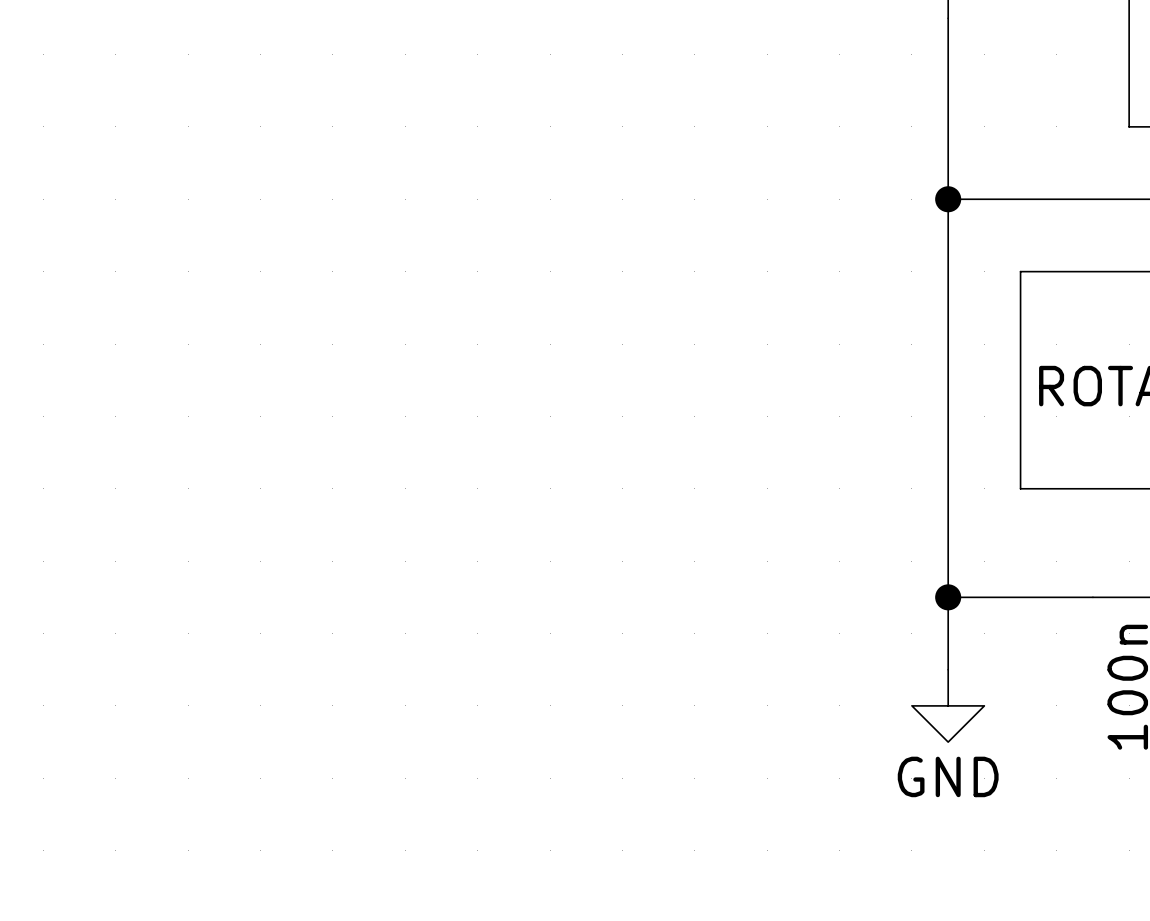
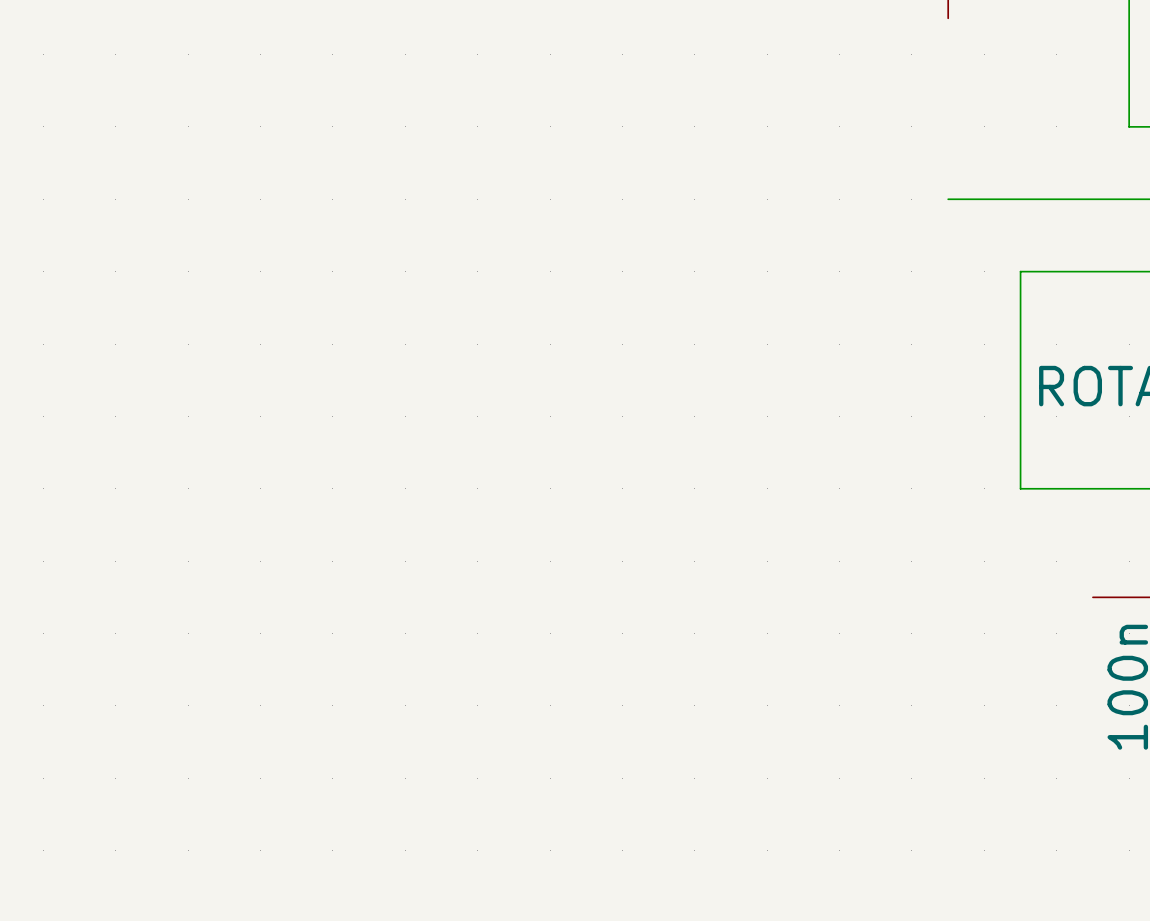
wire: (948, 18) (948, 669) -> none
junction: (948, 199) -> none
wire: (948, 597) (1092, 597) -> none
junction: (948, 597) -> none
power symbol: GND (948, 705) -> none

